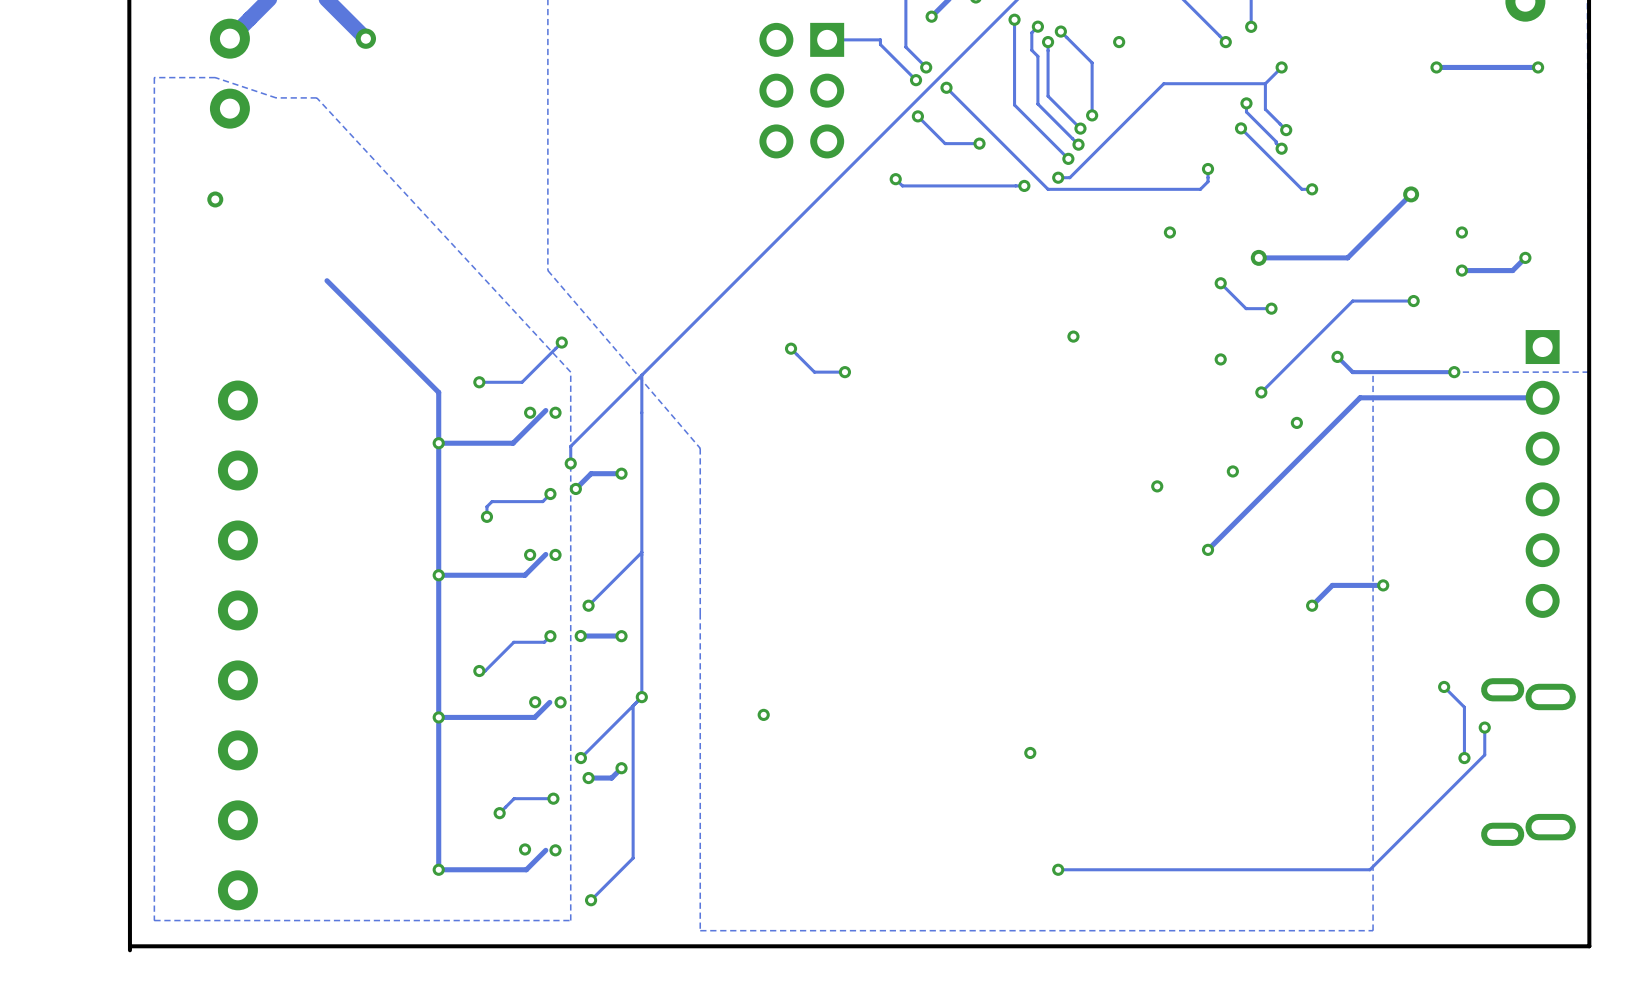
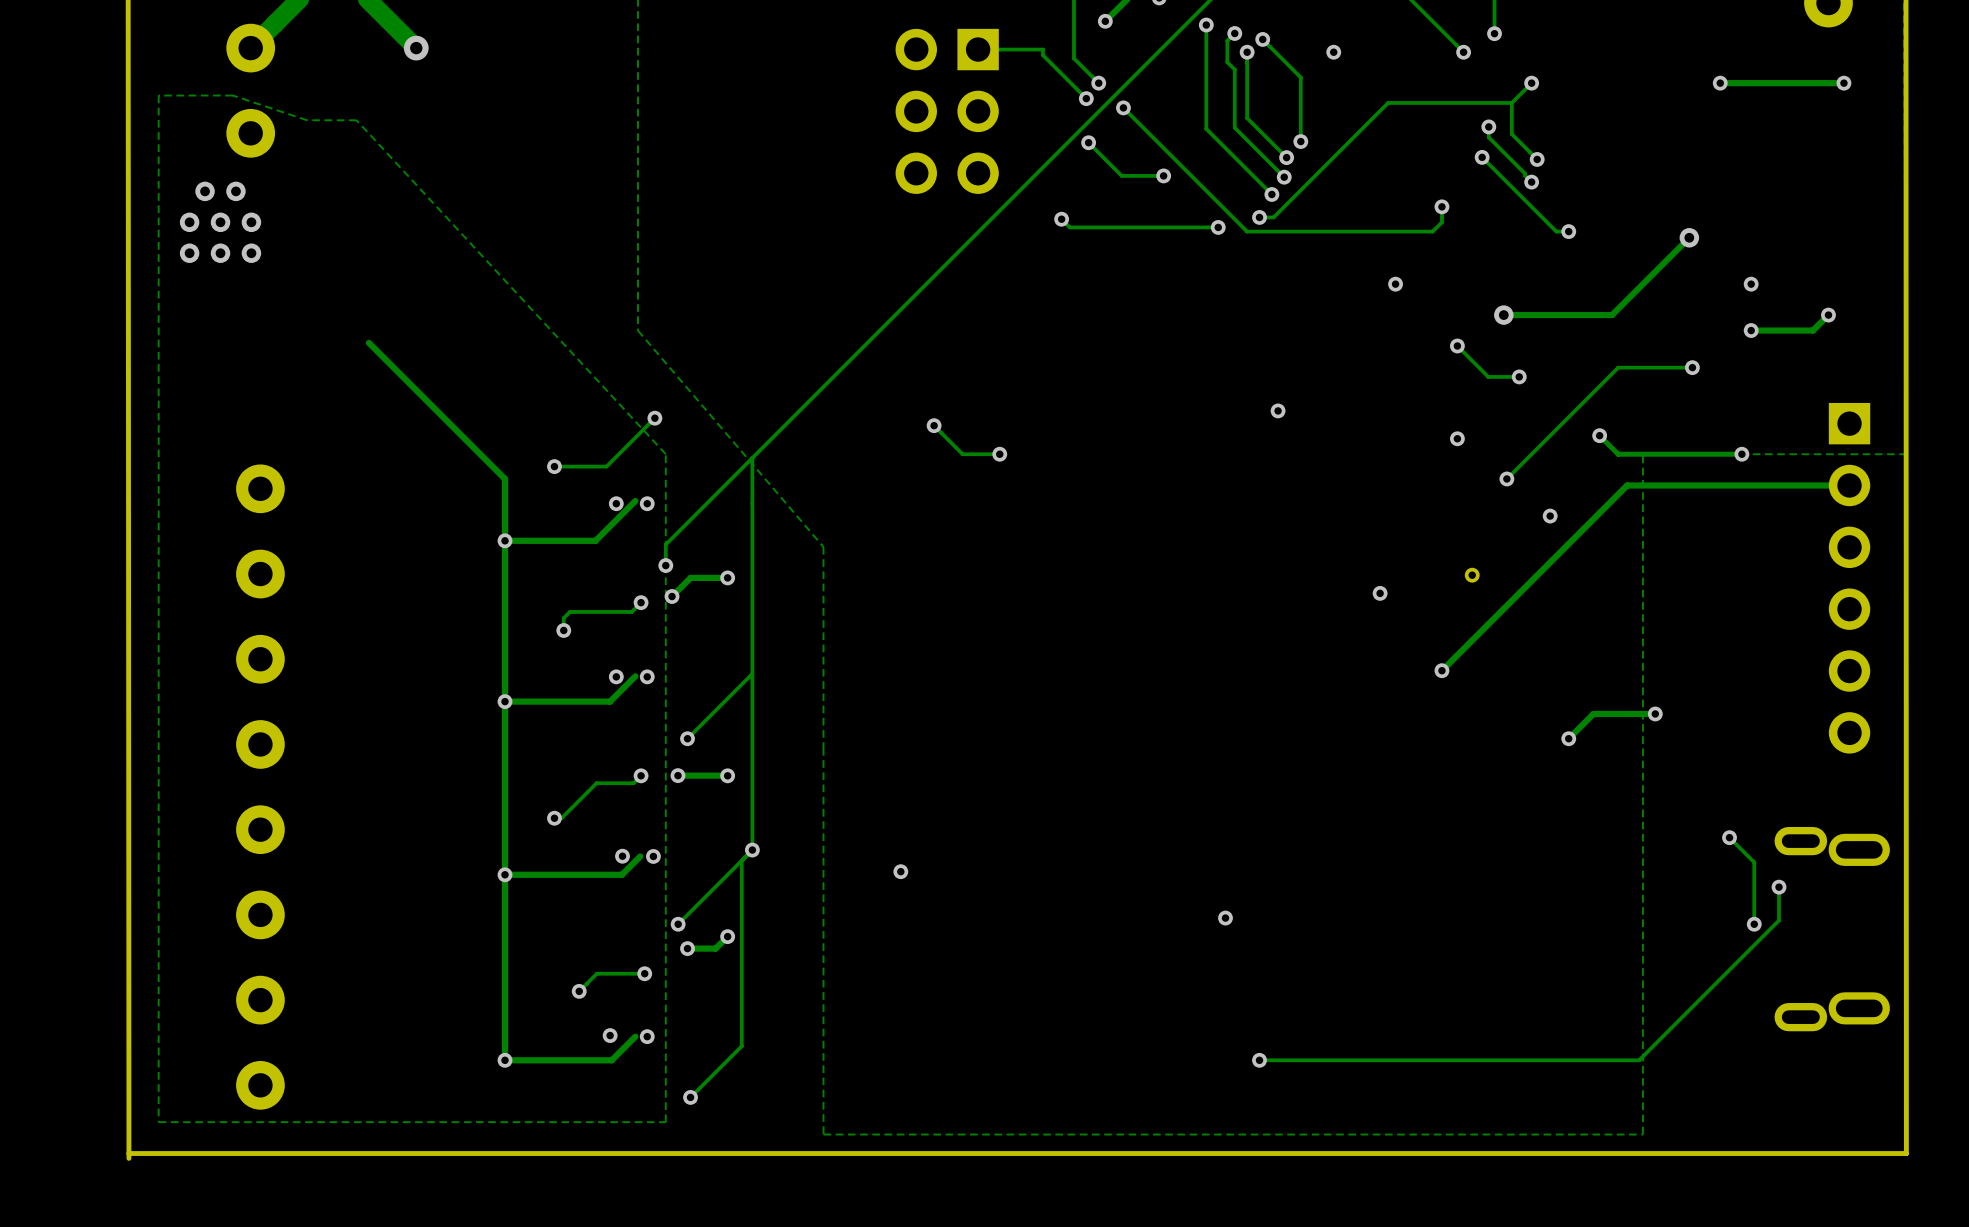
via: none -> (205, 191)
via: none -> (235, 191)
via: none -> (189, 222)
via: none -> (220, 222)
via: none -> (251, 222)
via: (215, 199) -> none
via: none -> (189, 253)
via: none -> (220, 253)
via: none -> (251, 253)

